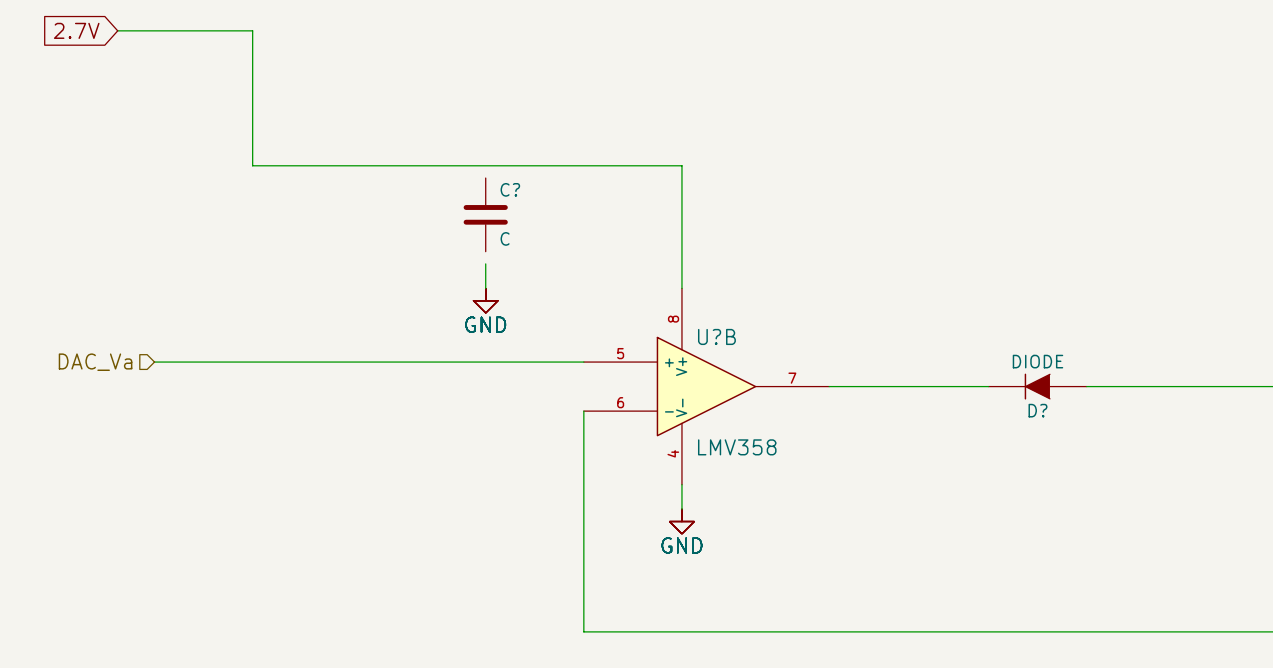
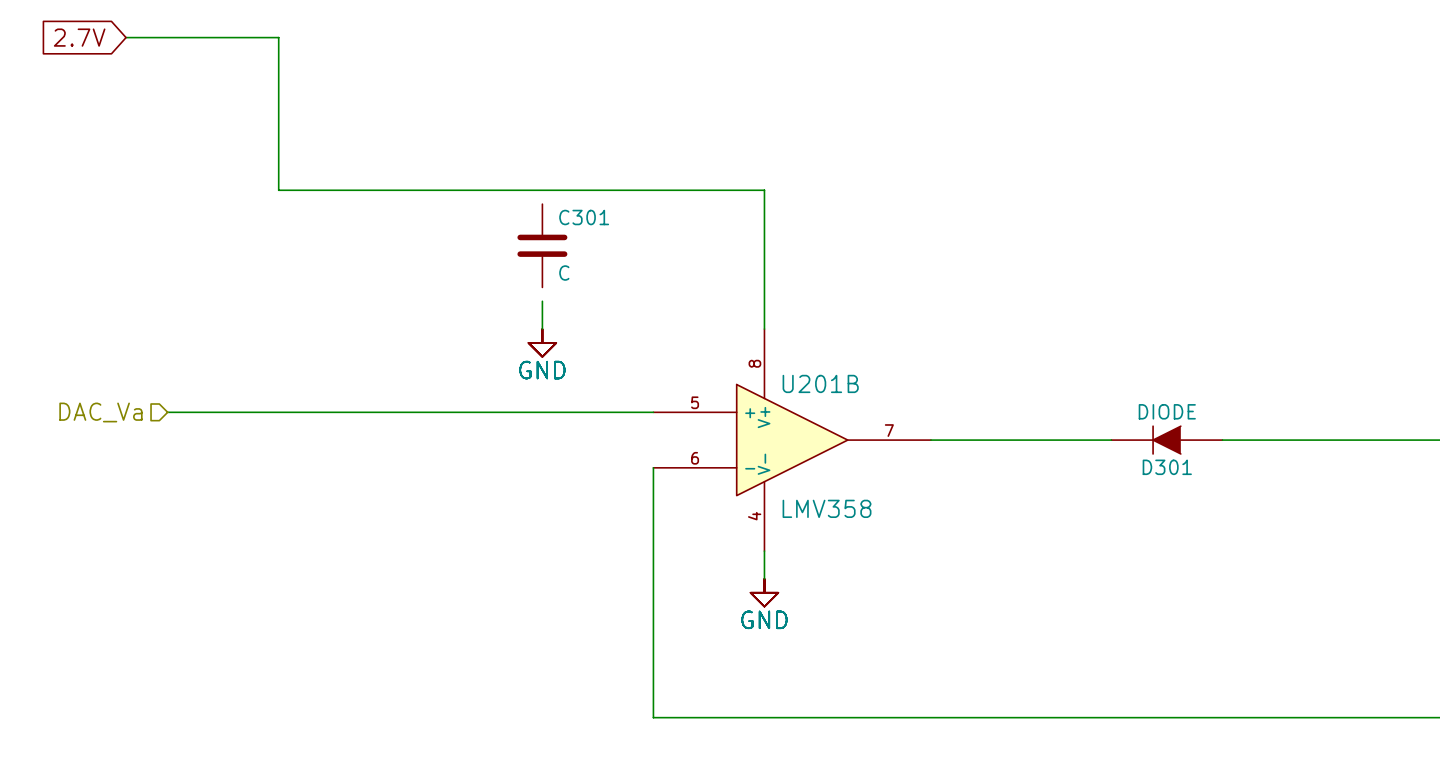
C? name: C? (510, 189) -> C301 (584, 217)
U?B name: U?B (716, 336) -> U201B (820, 383)
D? name: D? (1037, 410) -> D301 (1167, 467)

